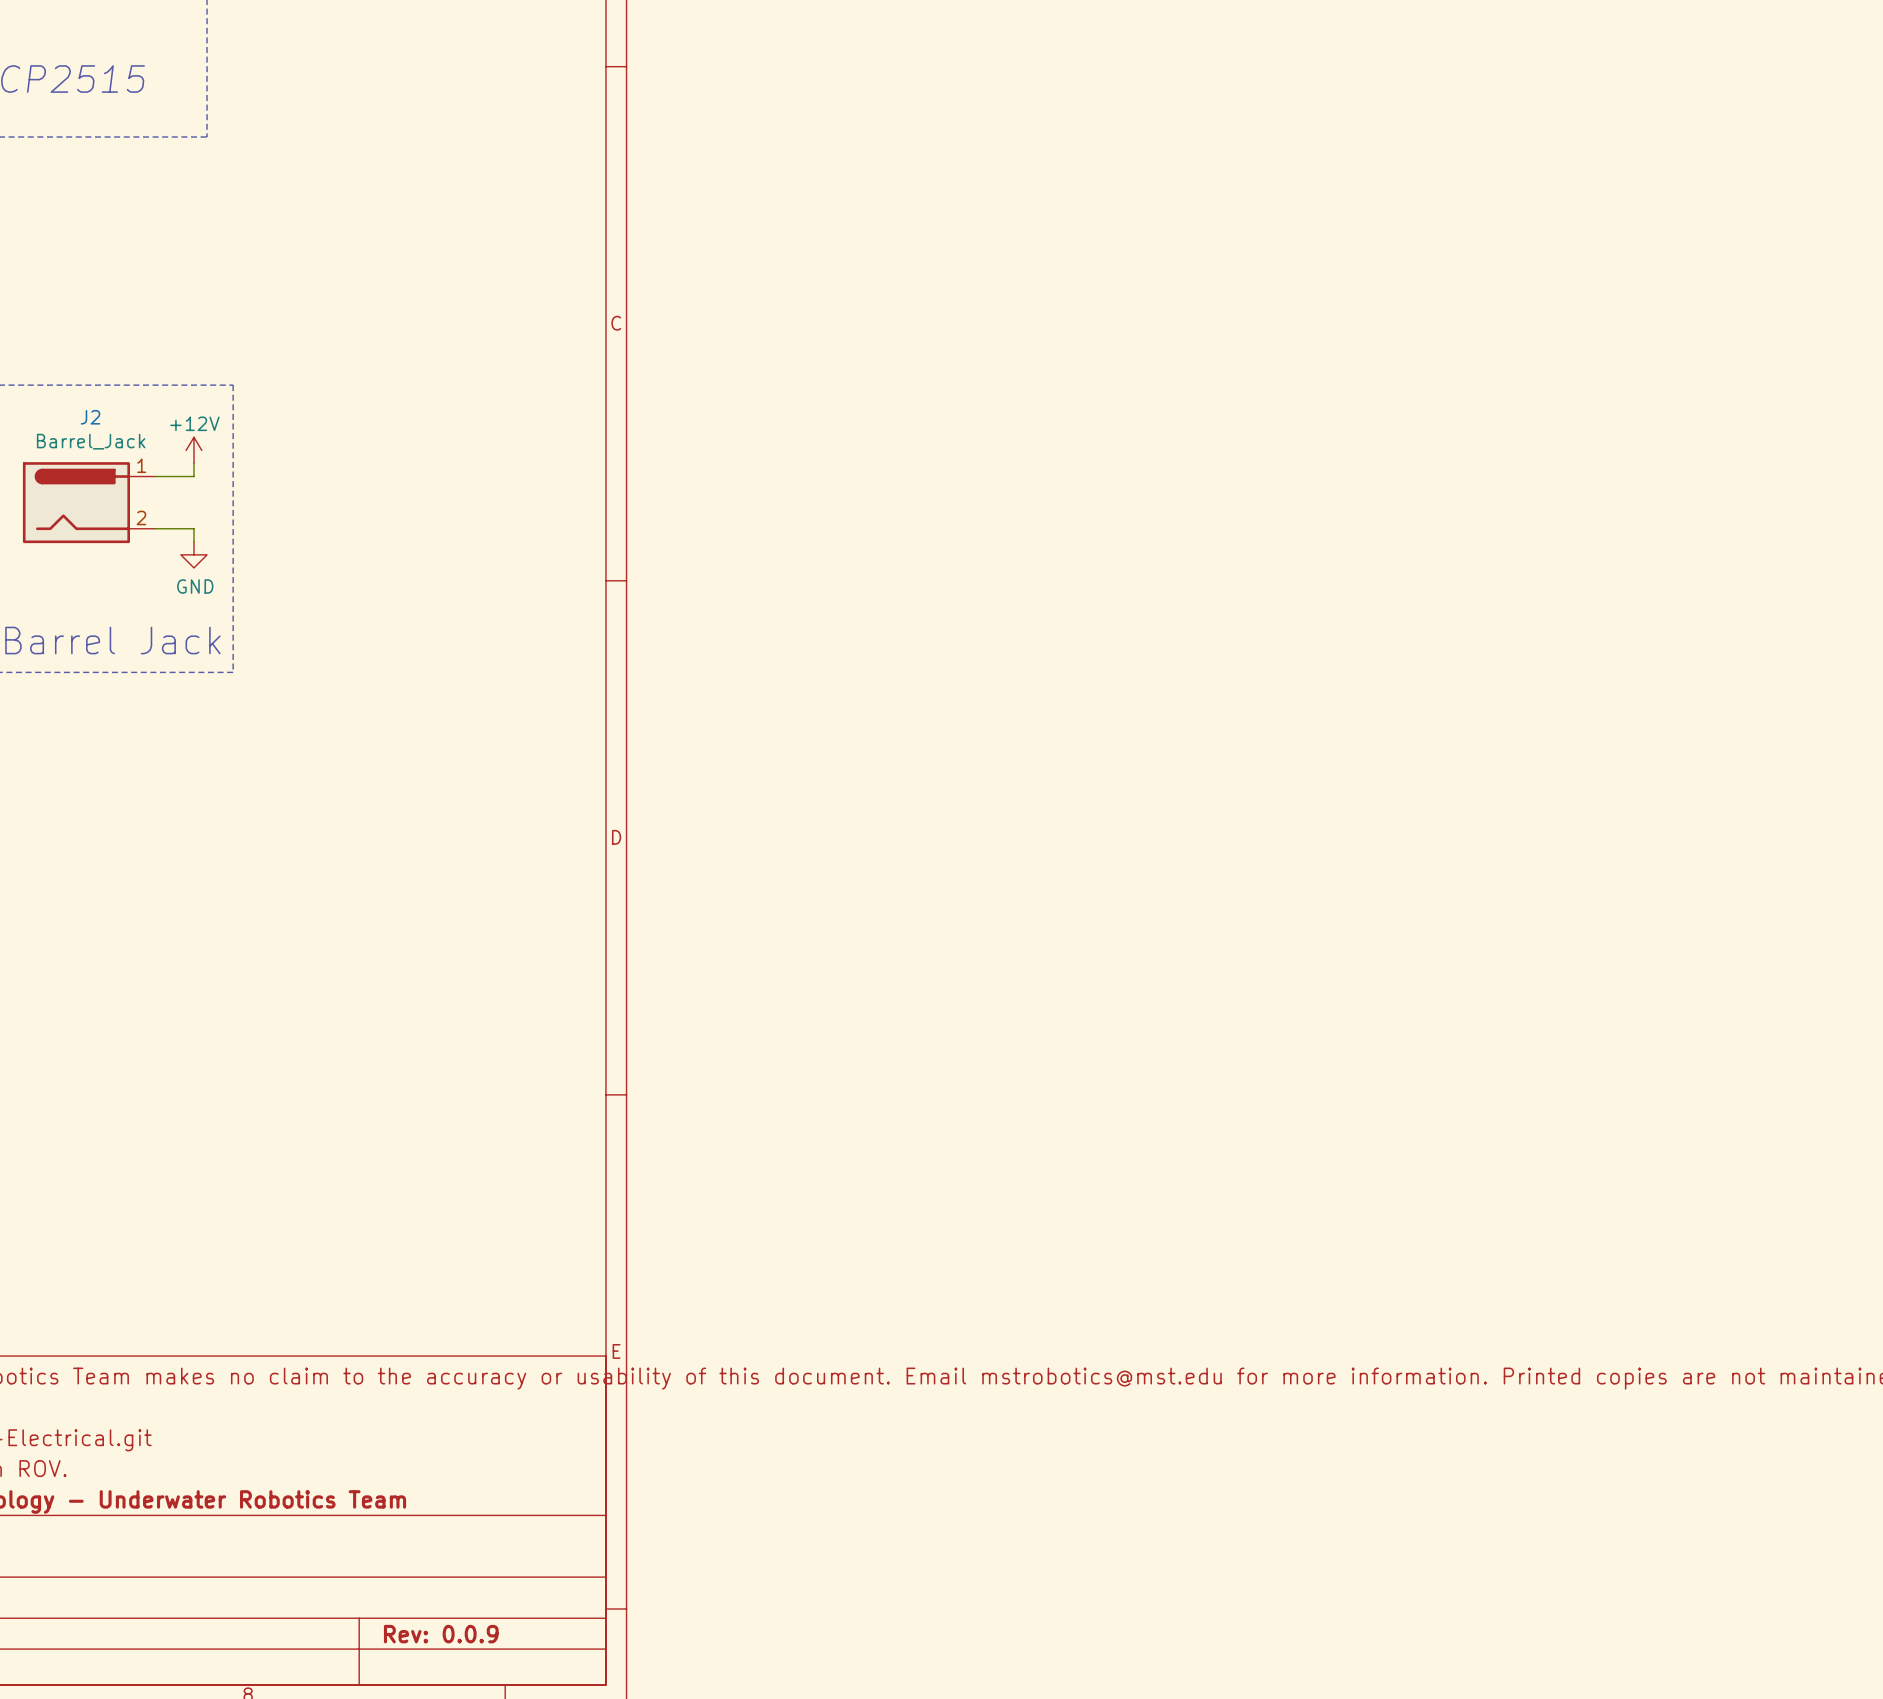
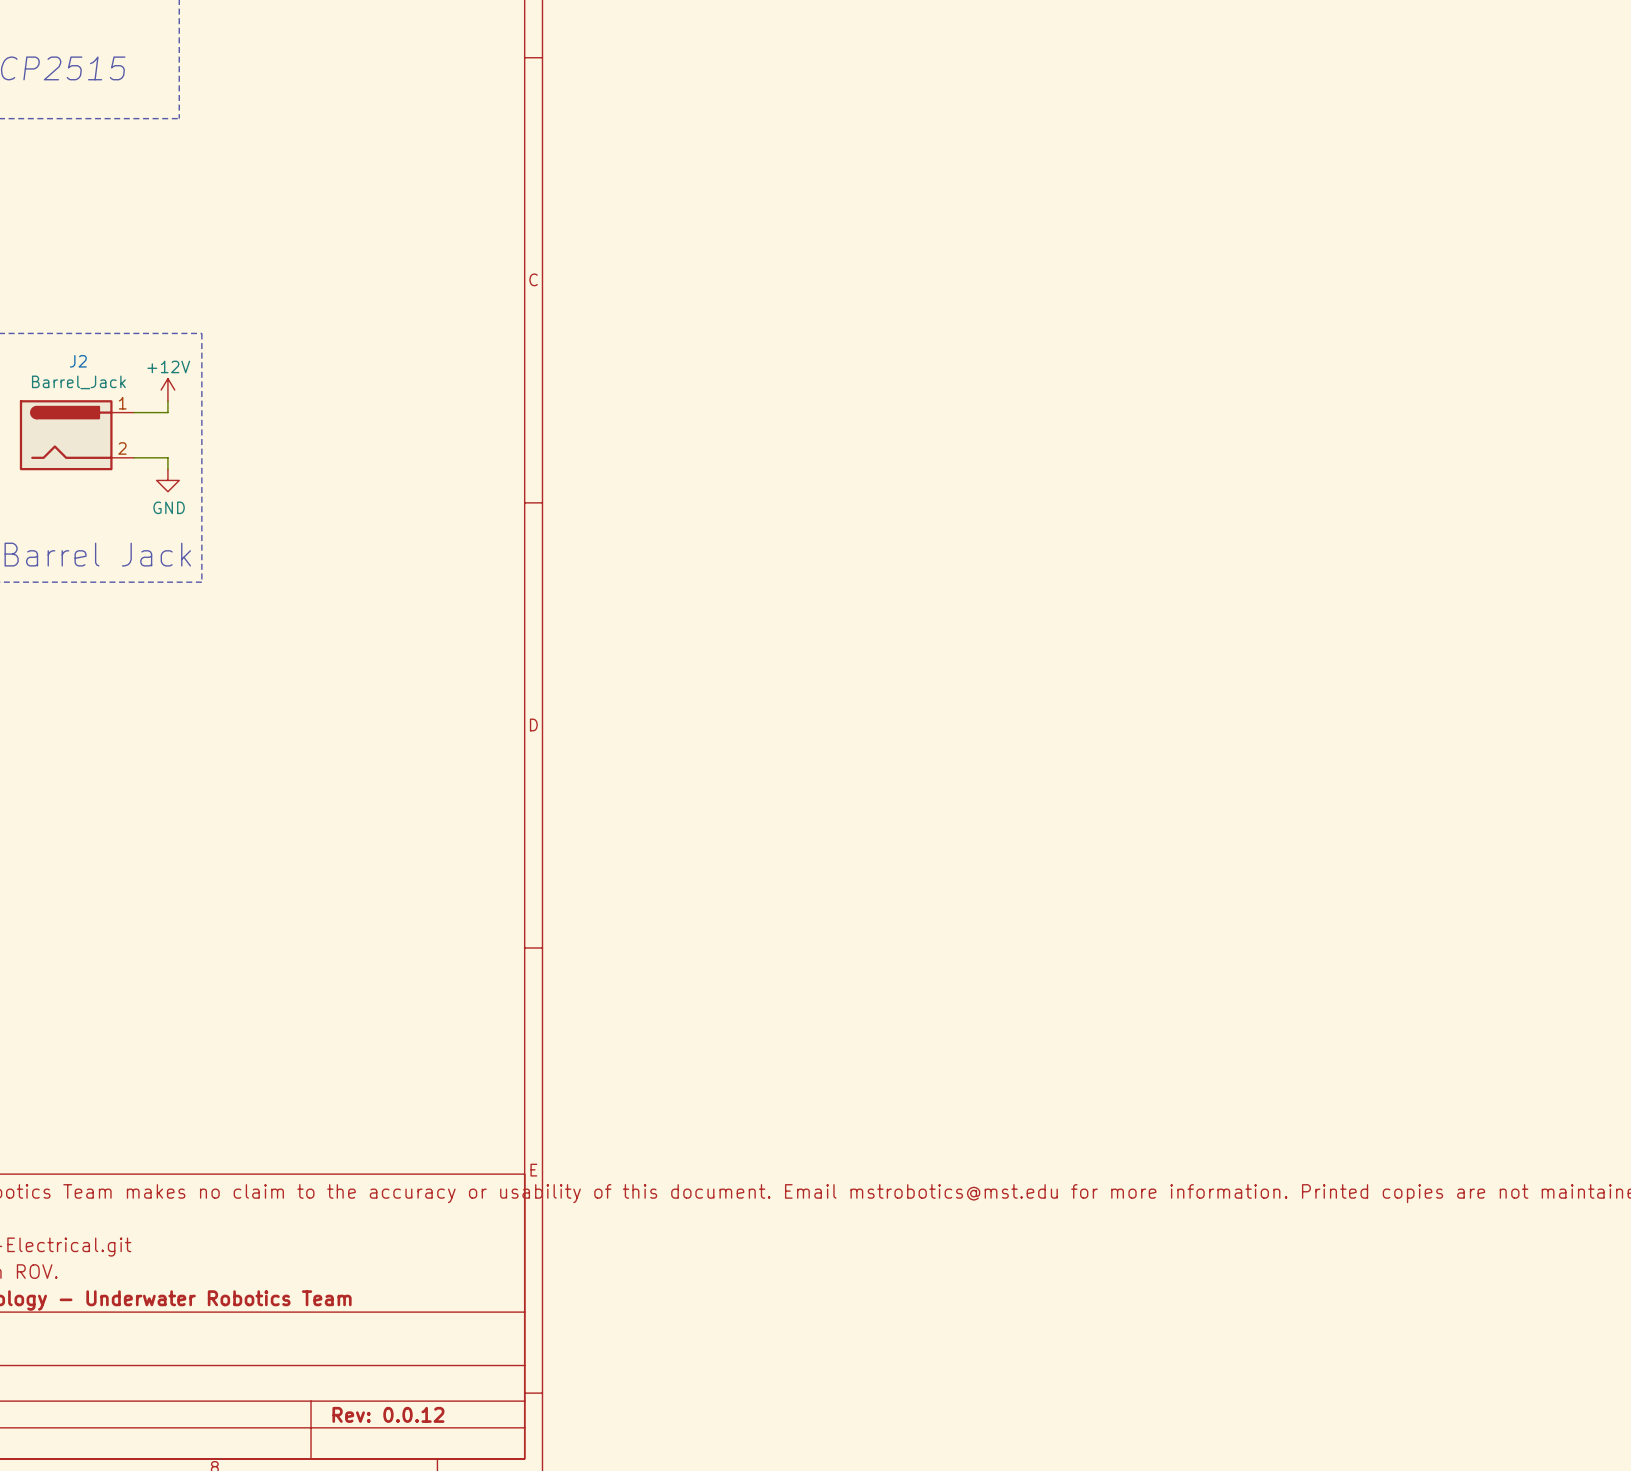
title block: Rev: 0.0.9 (441, 1634) -> Rev: 0.0.12 (388, 1414)

